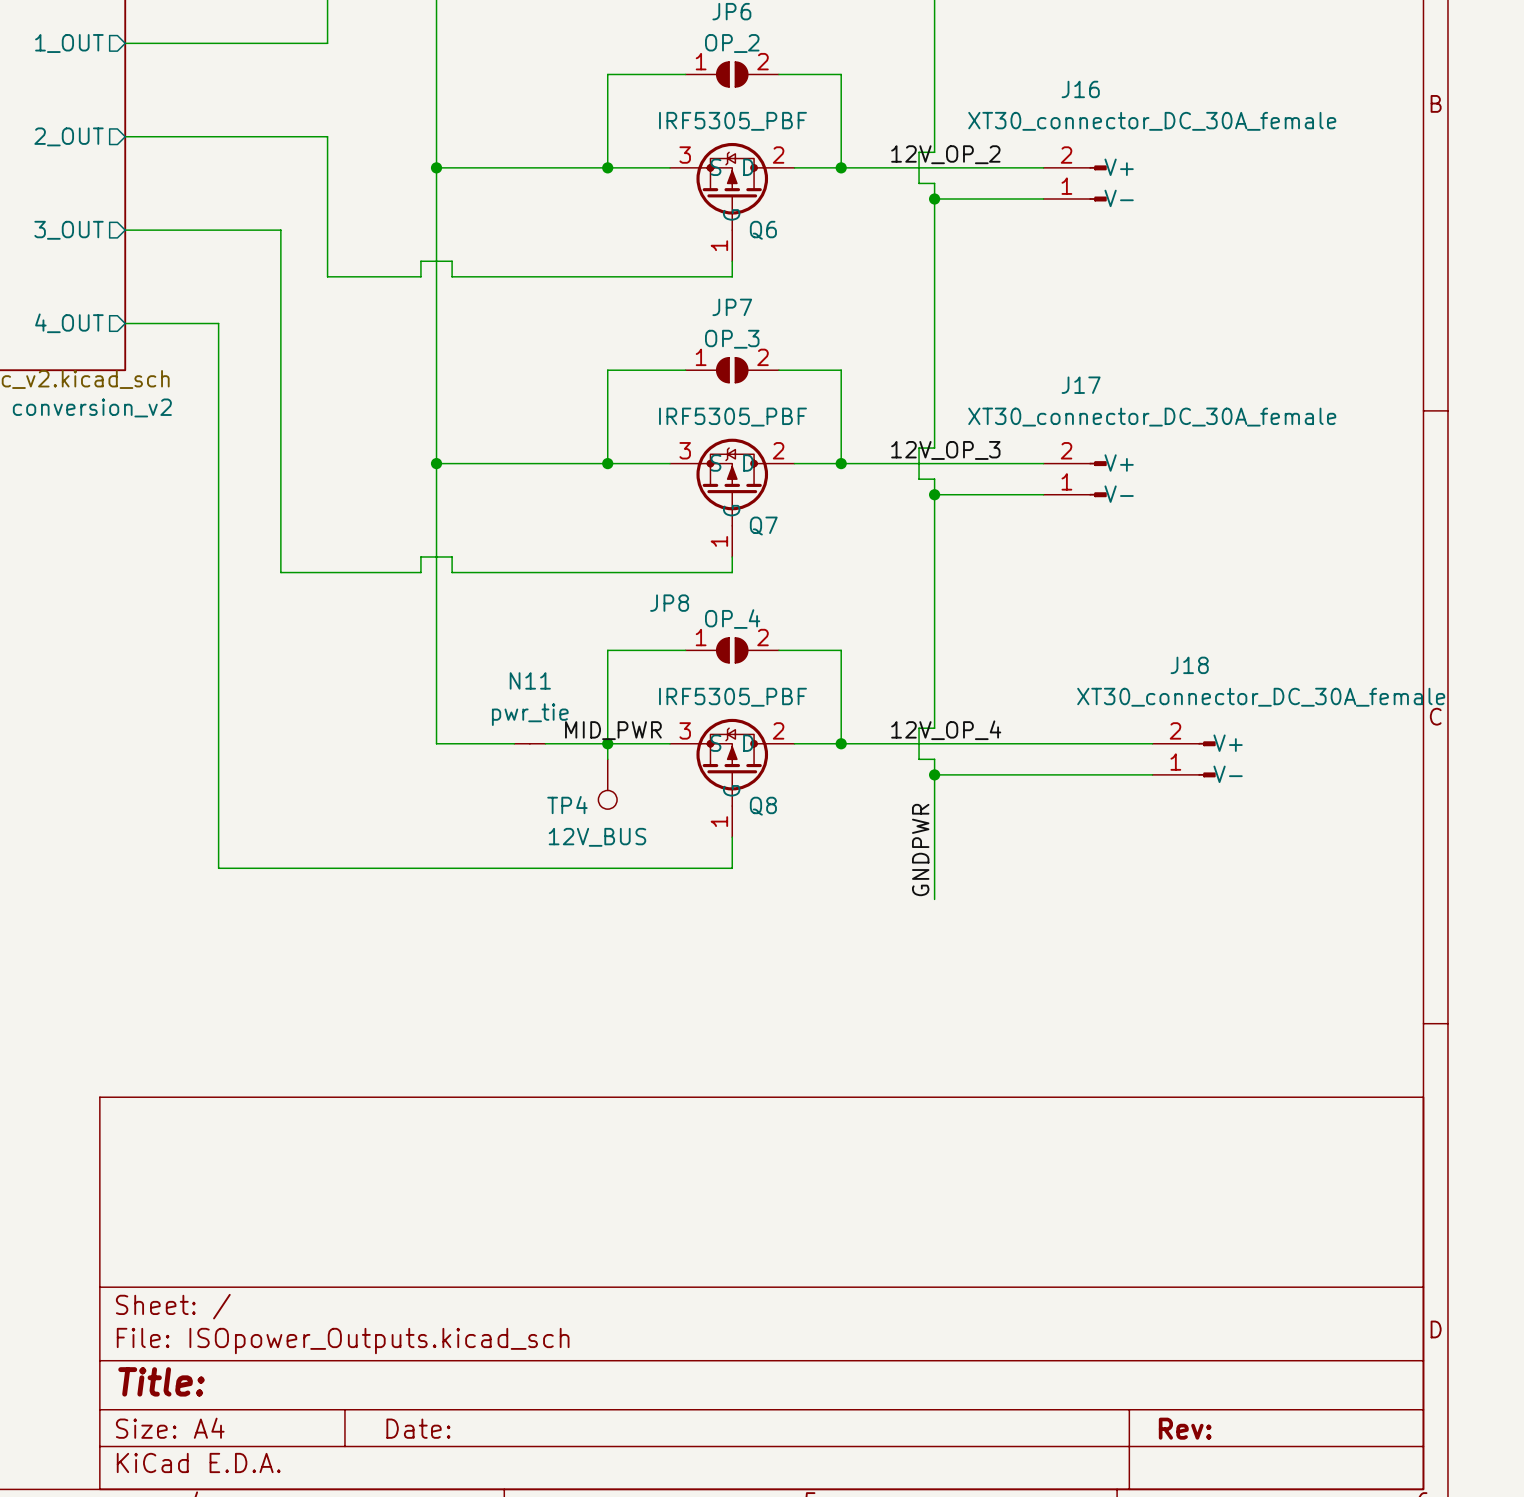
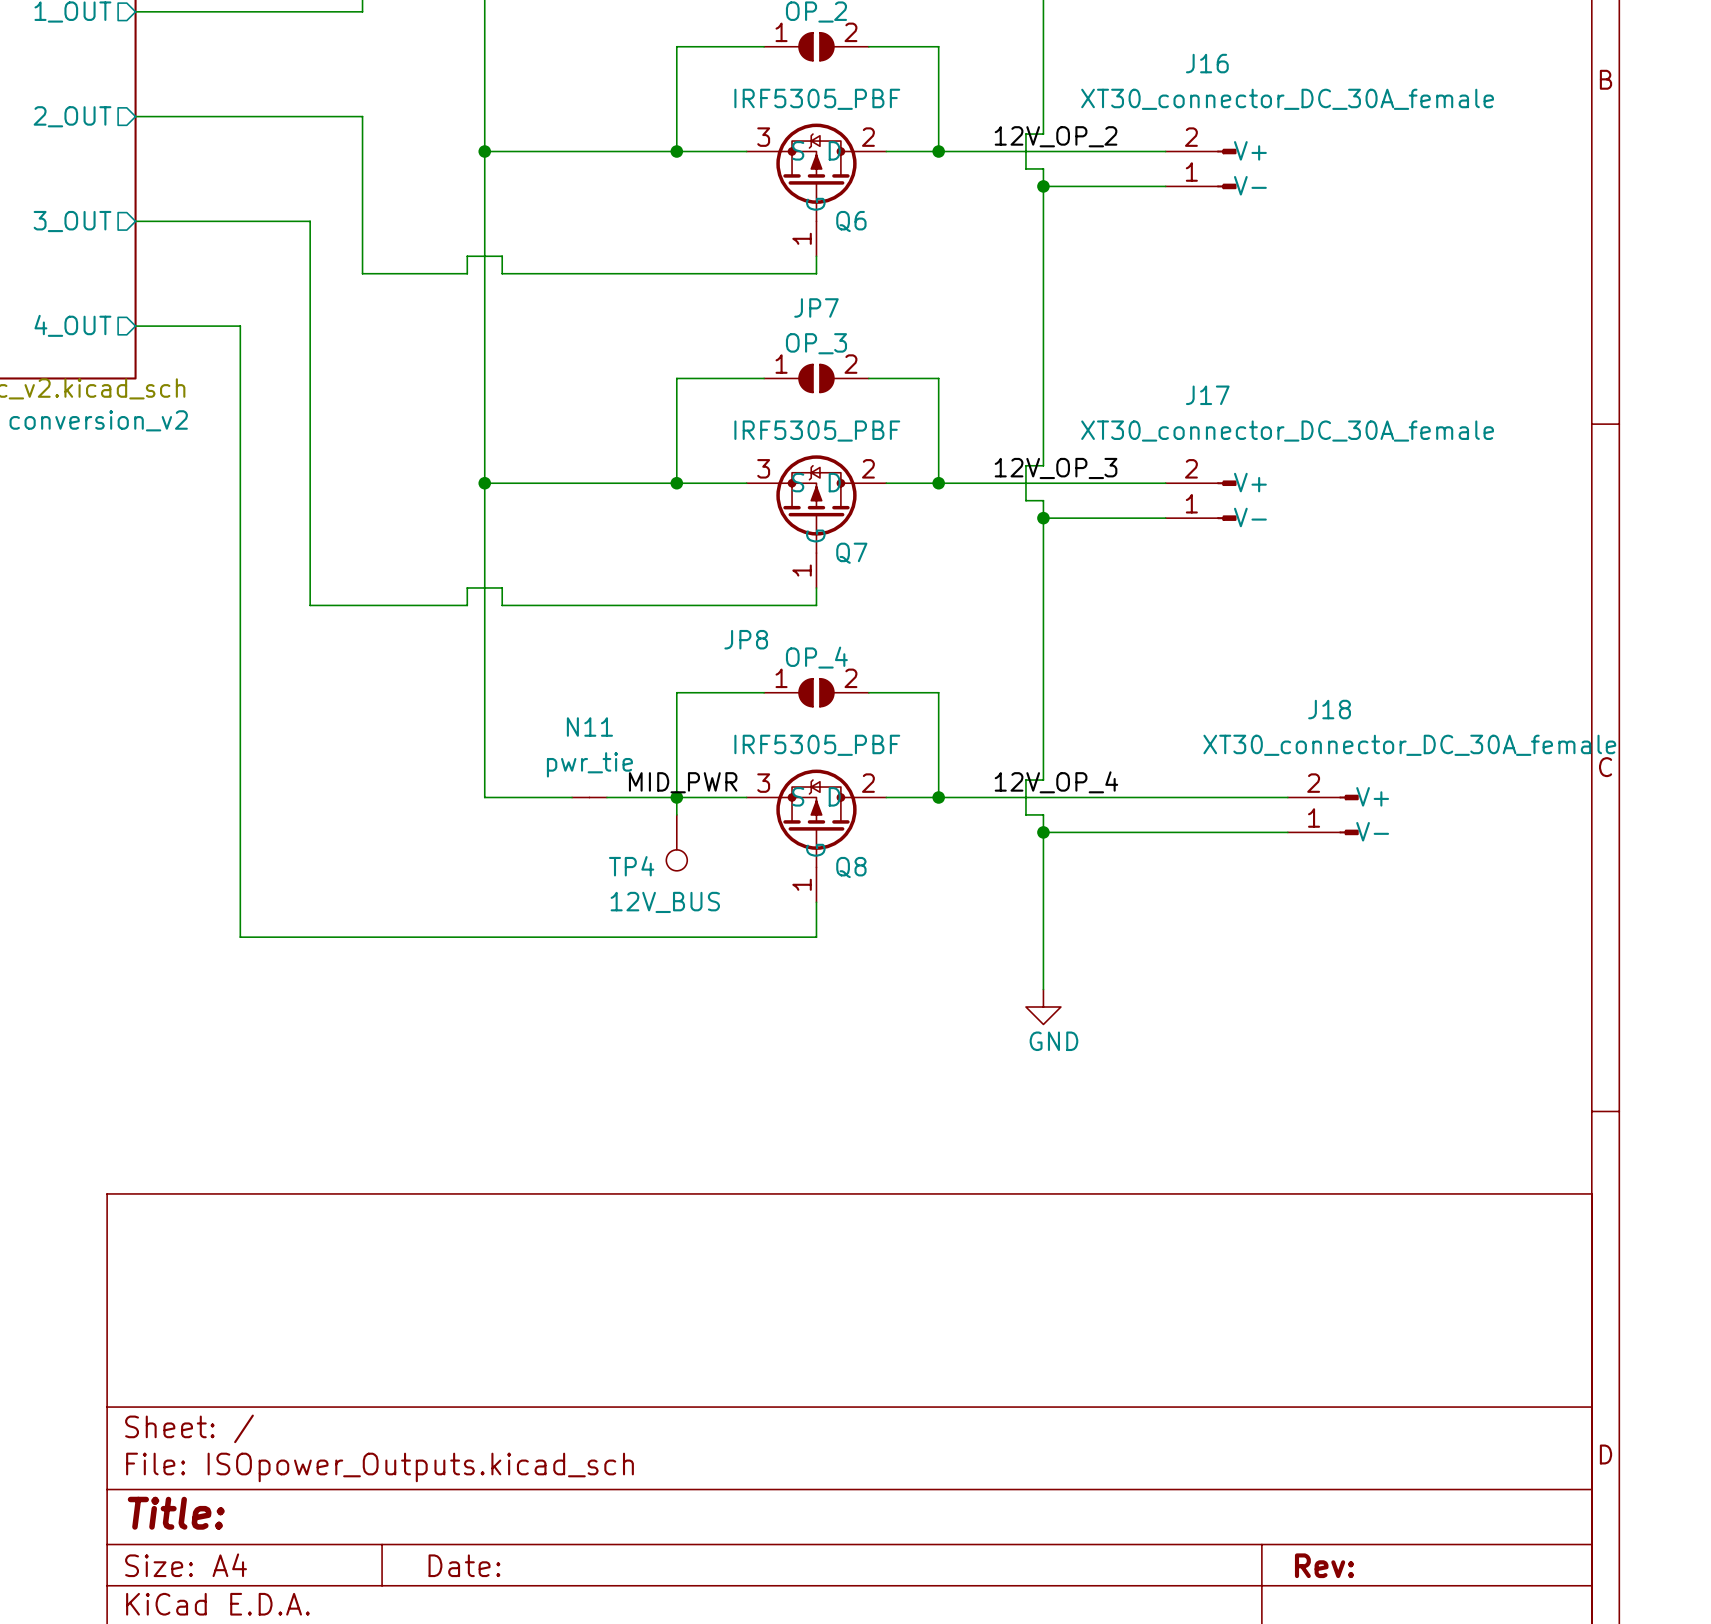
label: GNDPWR (920, 850) -> none
wire: none -> (1043, 972) (1043, 989)
power symbol: none -> GND (1043, 1007)

